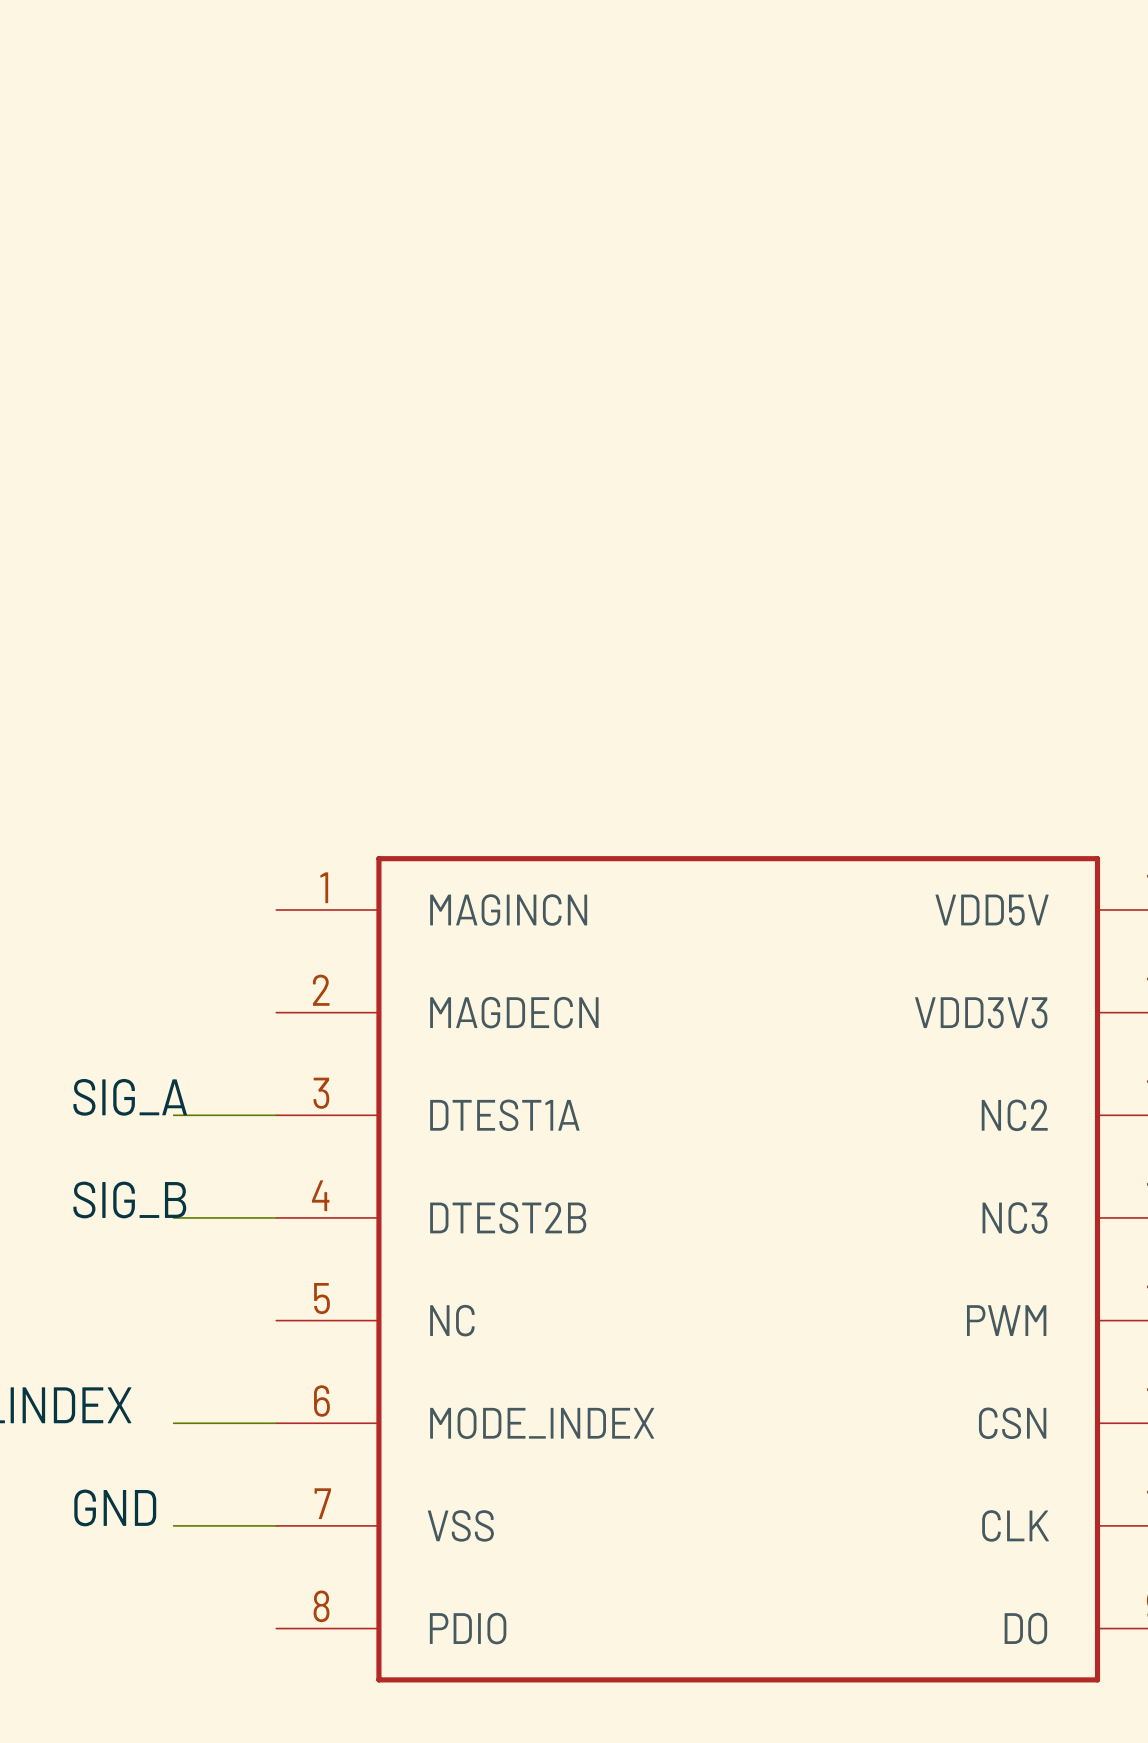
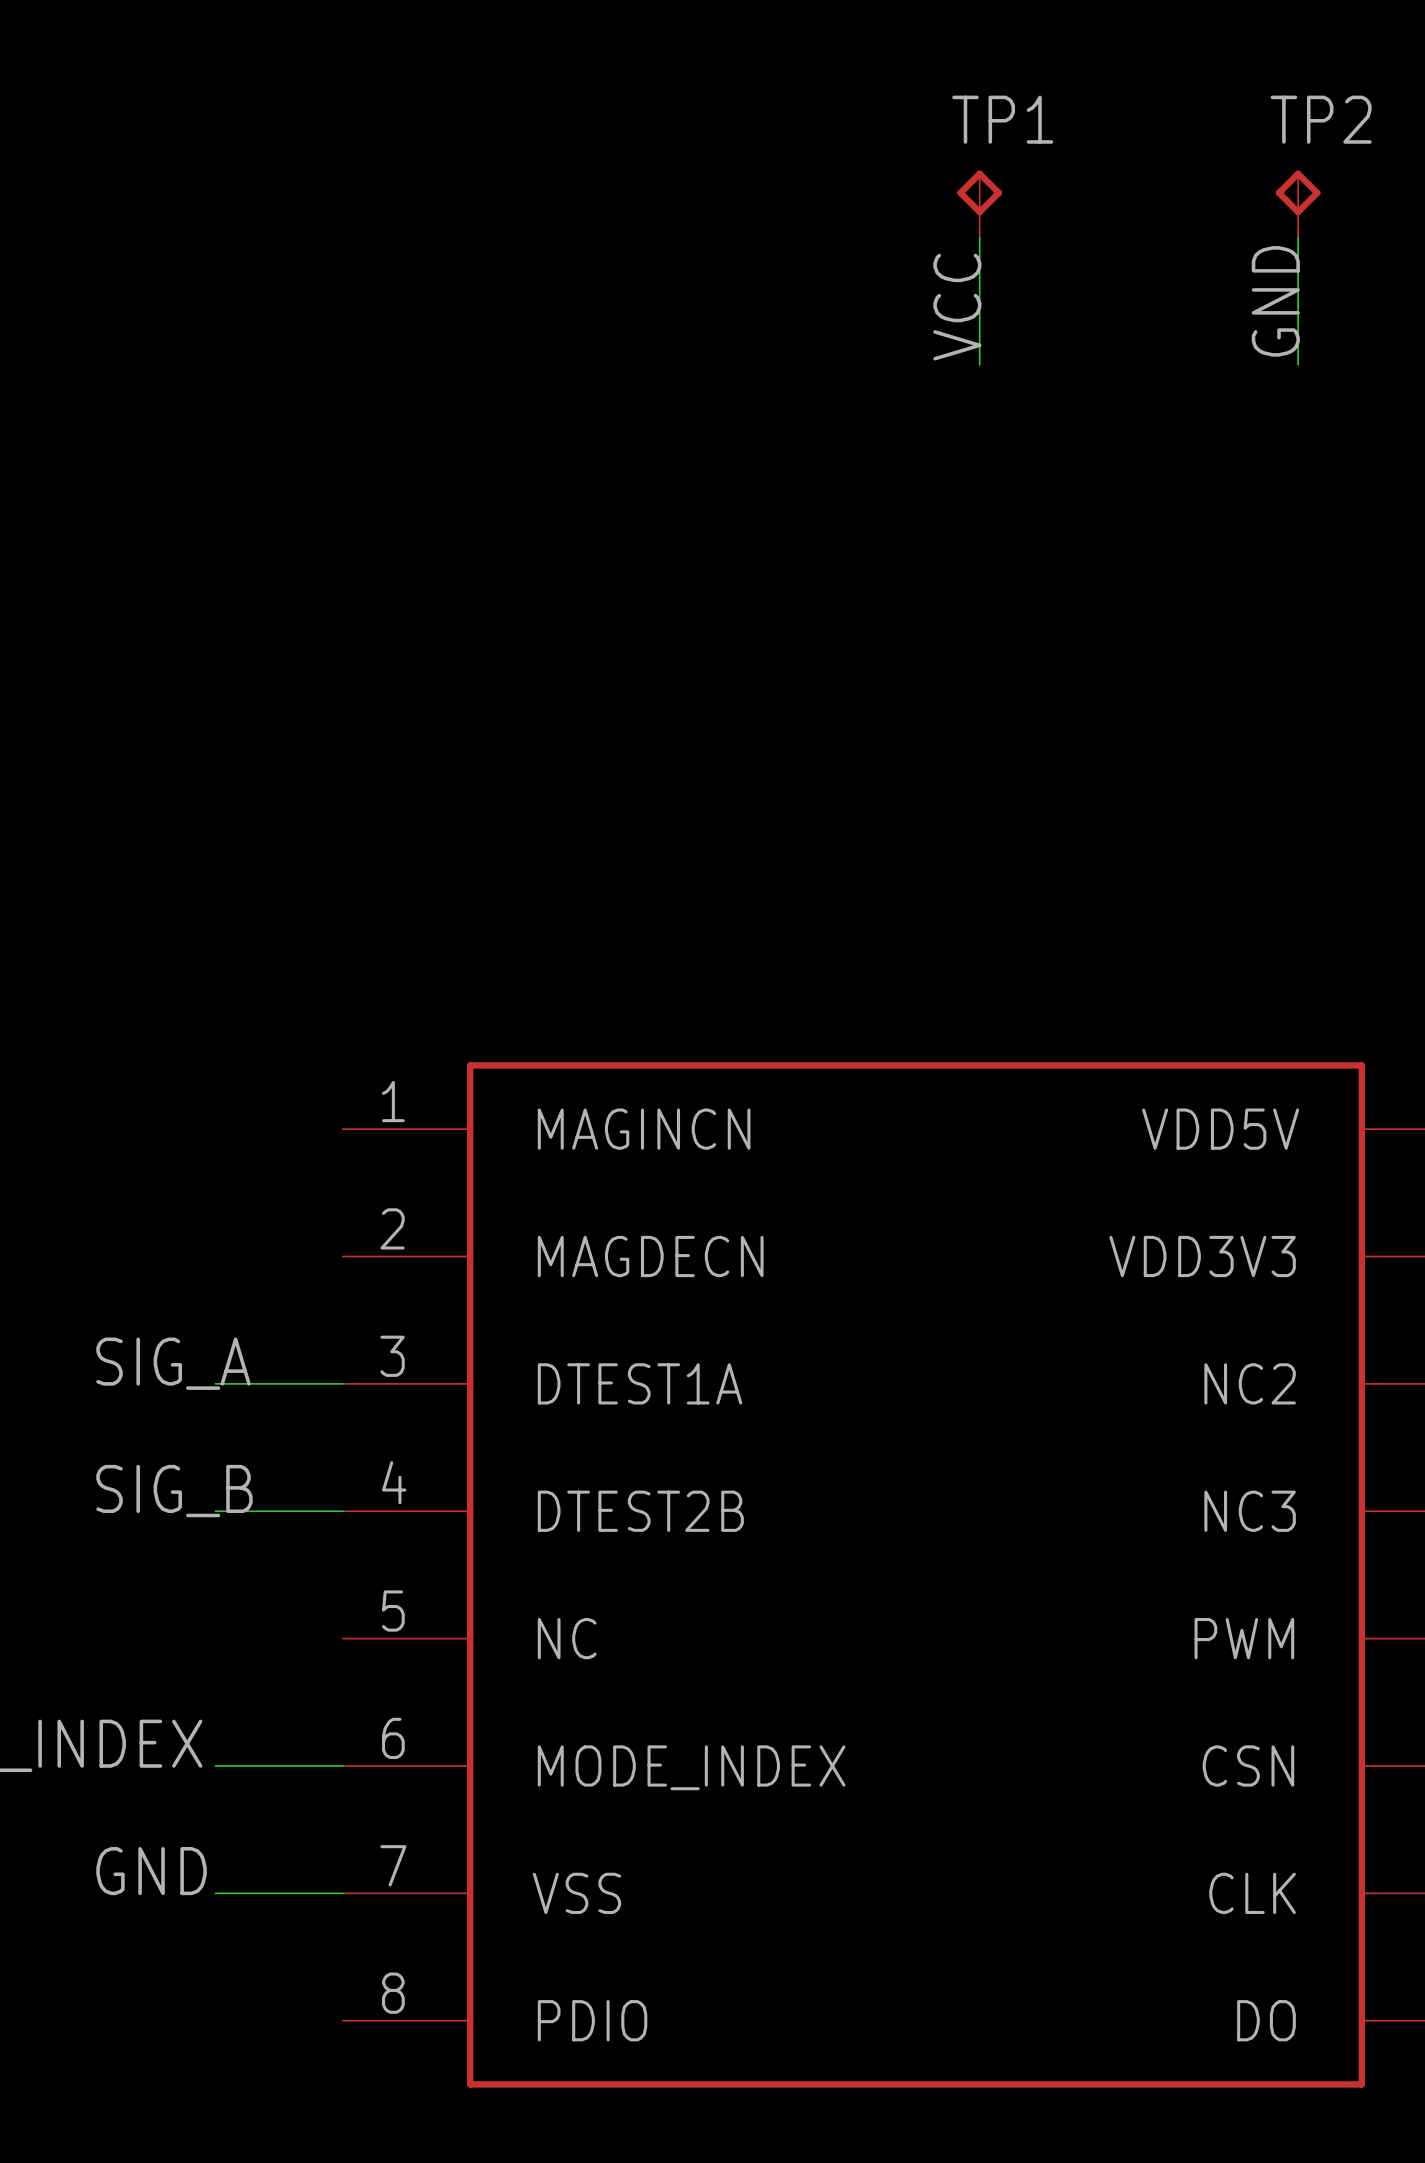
TP1: none -> (979, 204)
TP2: none -> (1298, 204)
wire: none -> (979, 237) (979, 364)
wire: none -> (1298, 237) (1298, 364)
label: none -> GND (1275, 301)
label: none -> VCC (957, 307)

